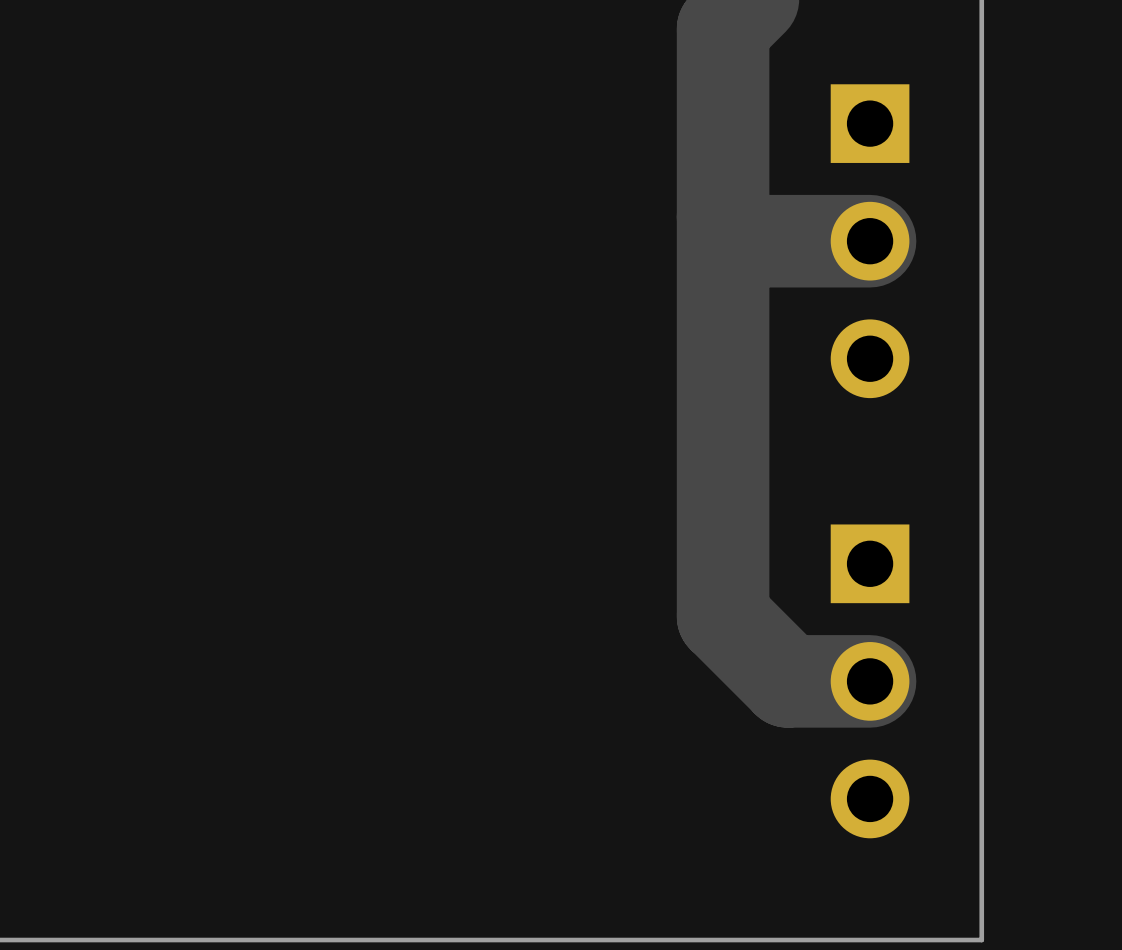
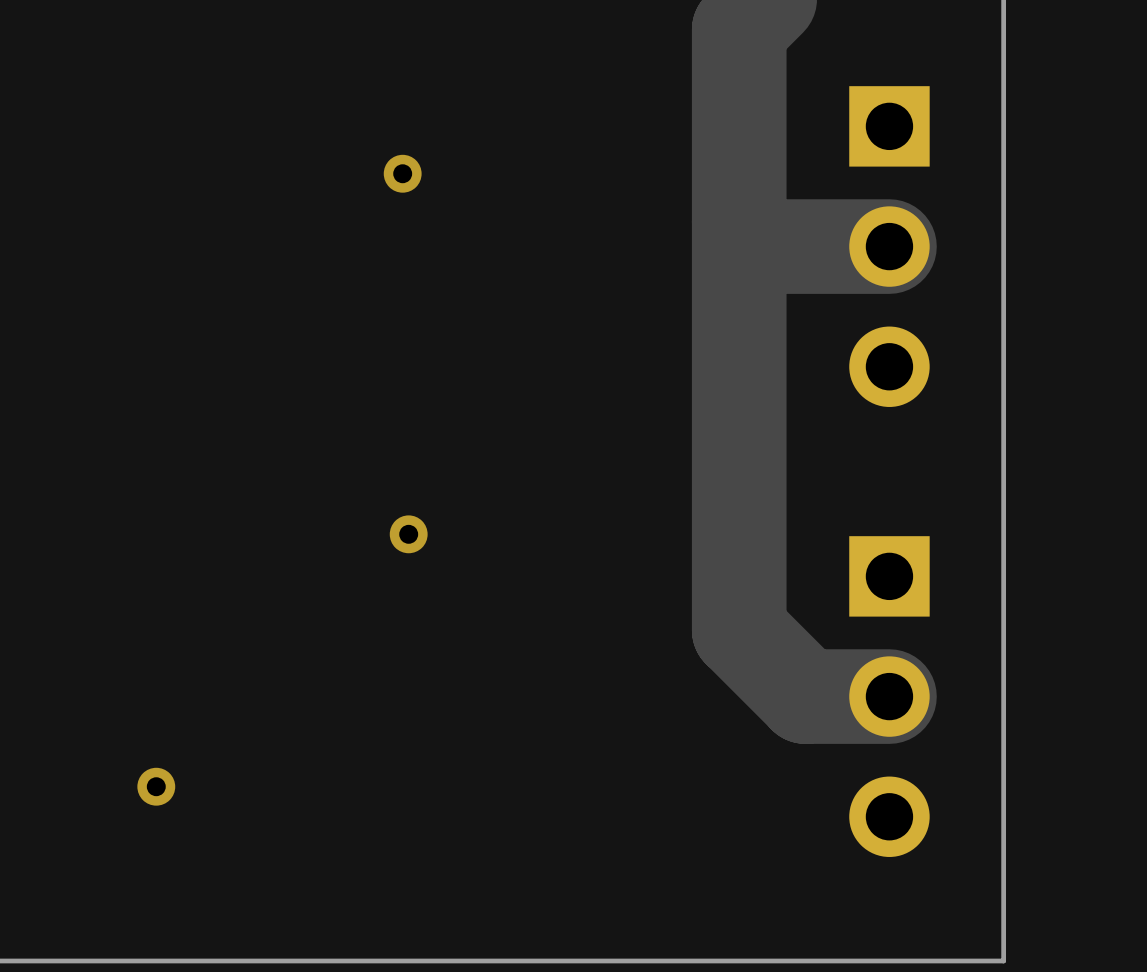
via: none -> (402, 173)
via: none -> (408, 534)
via: none -> (156, 786)

